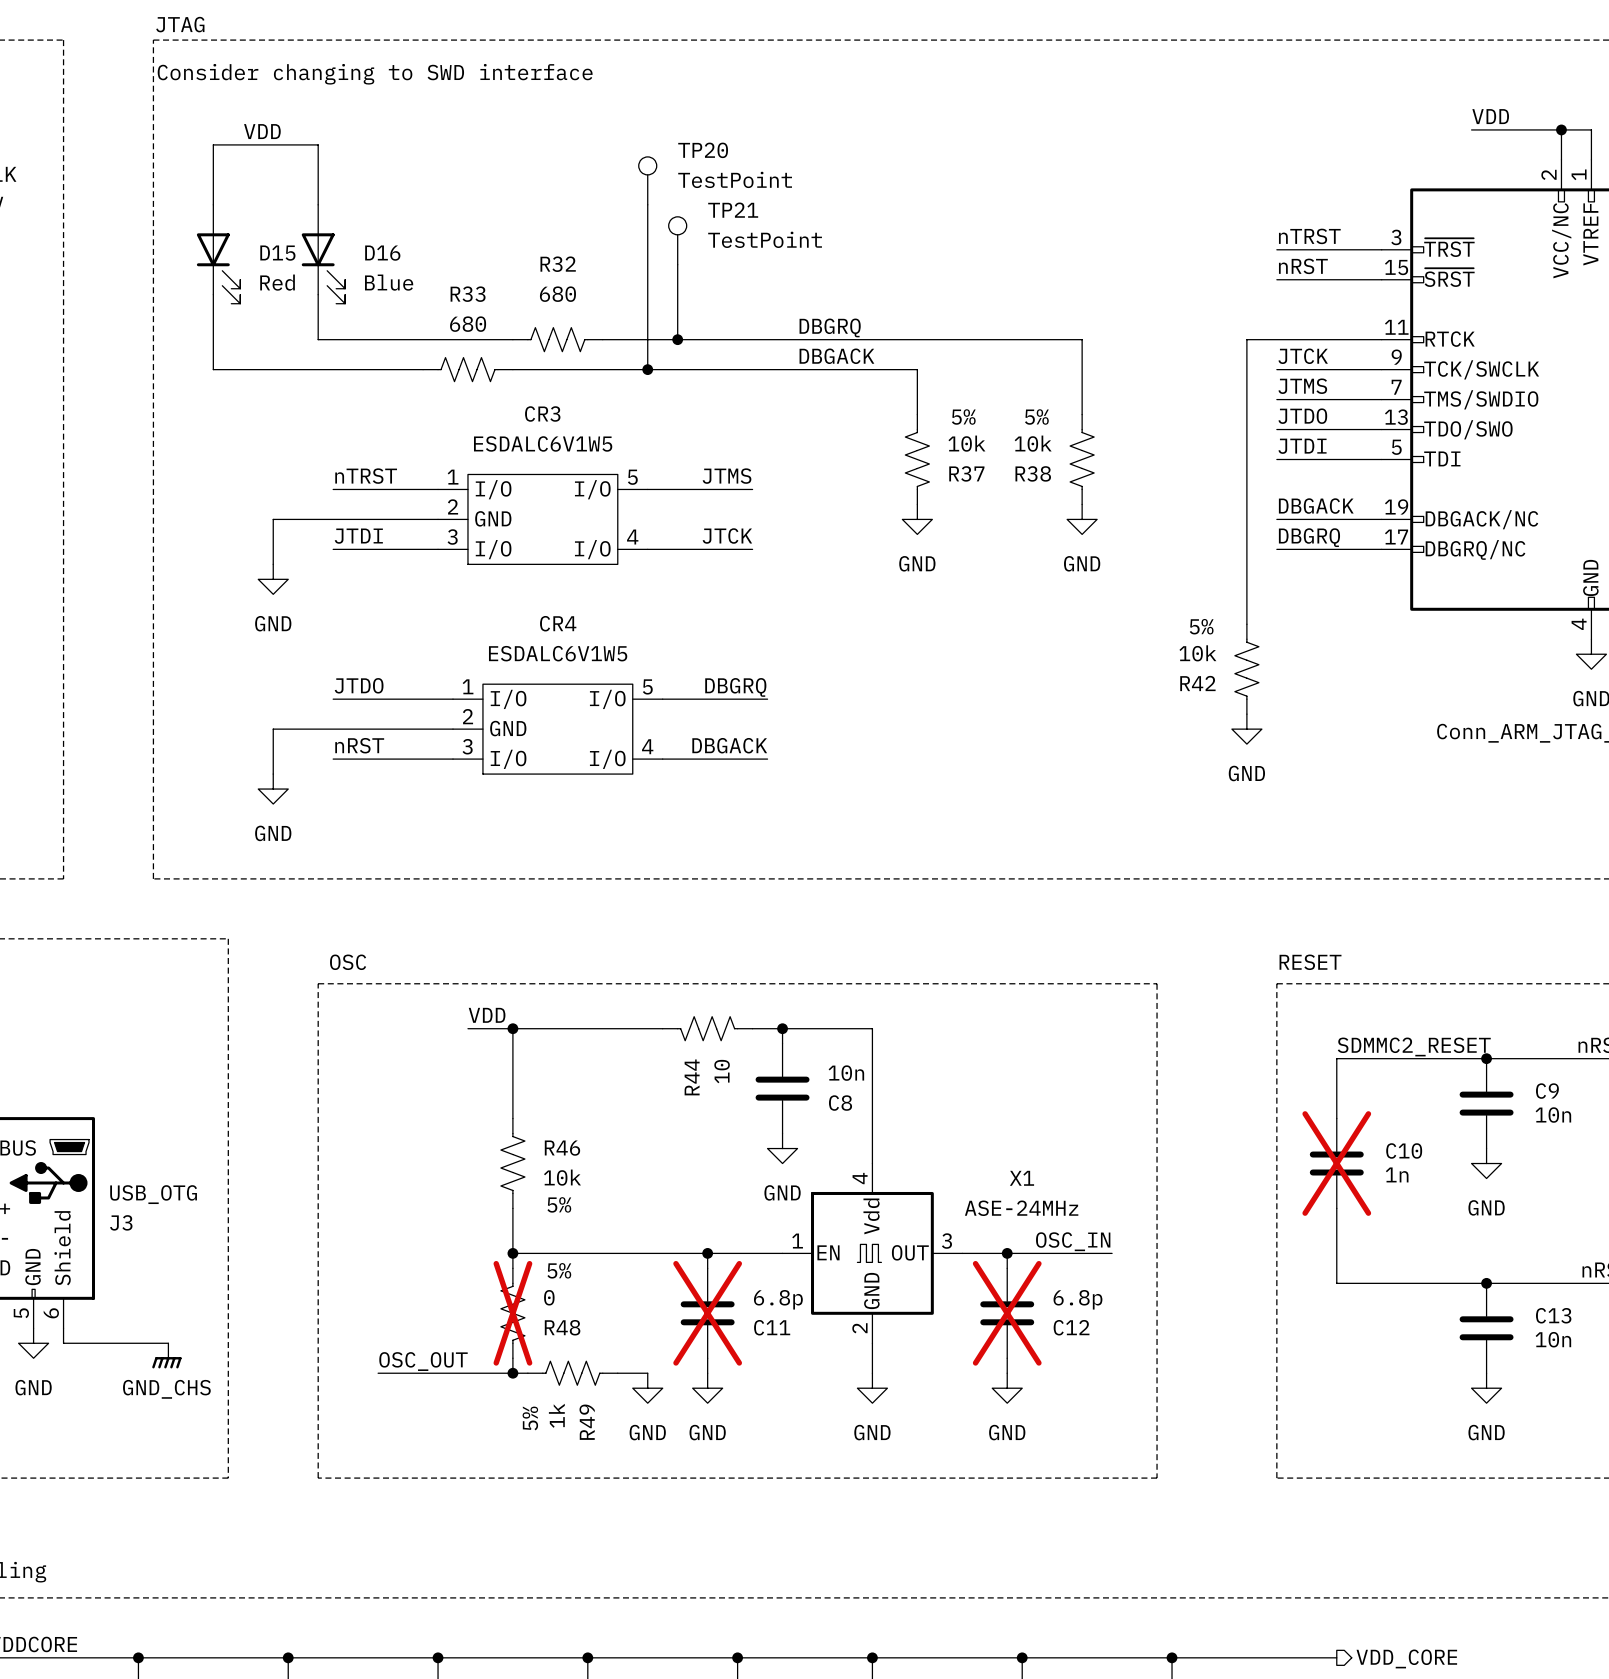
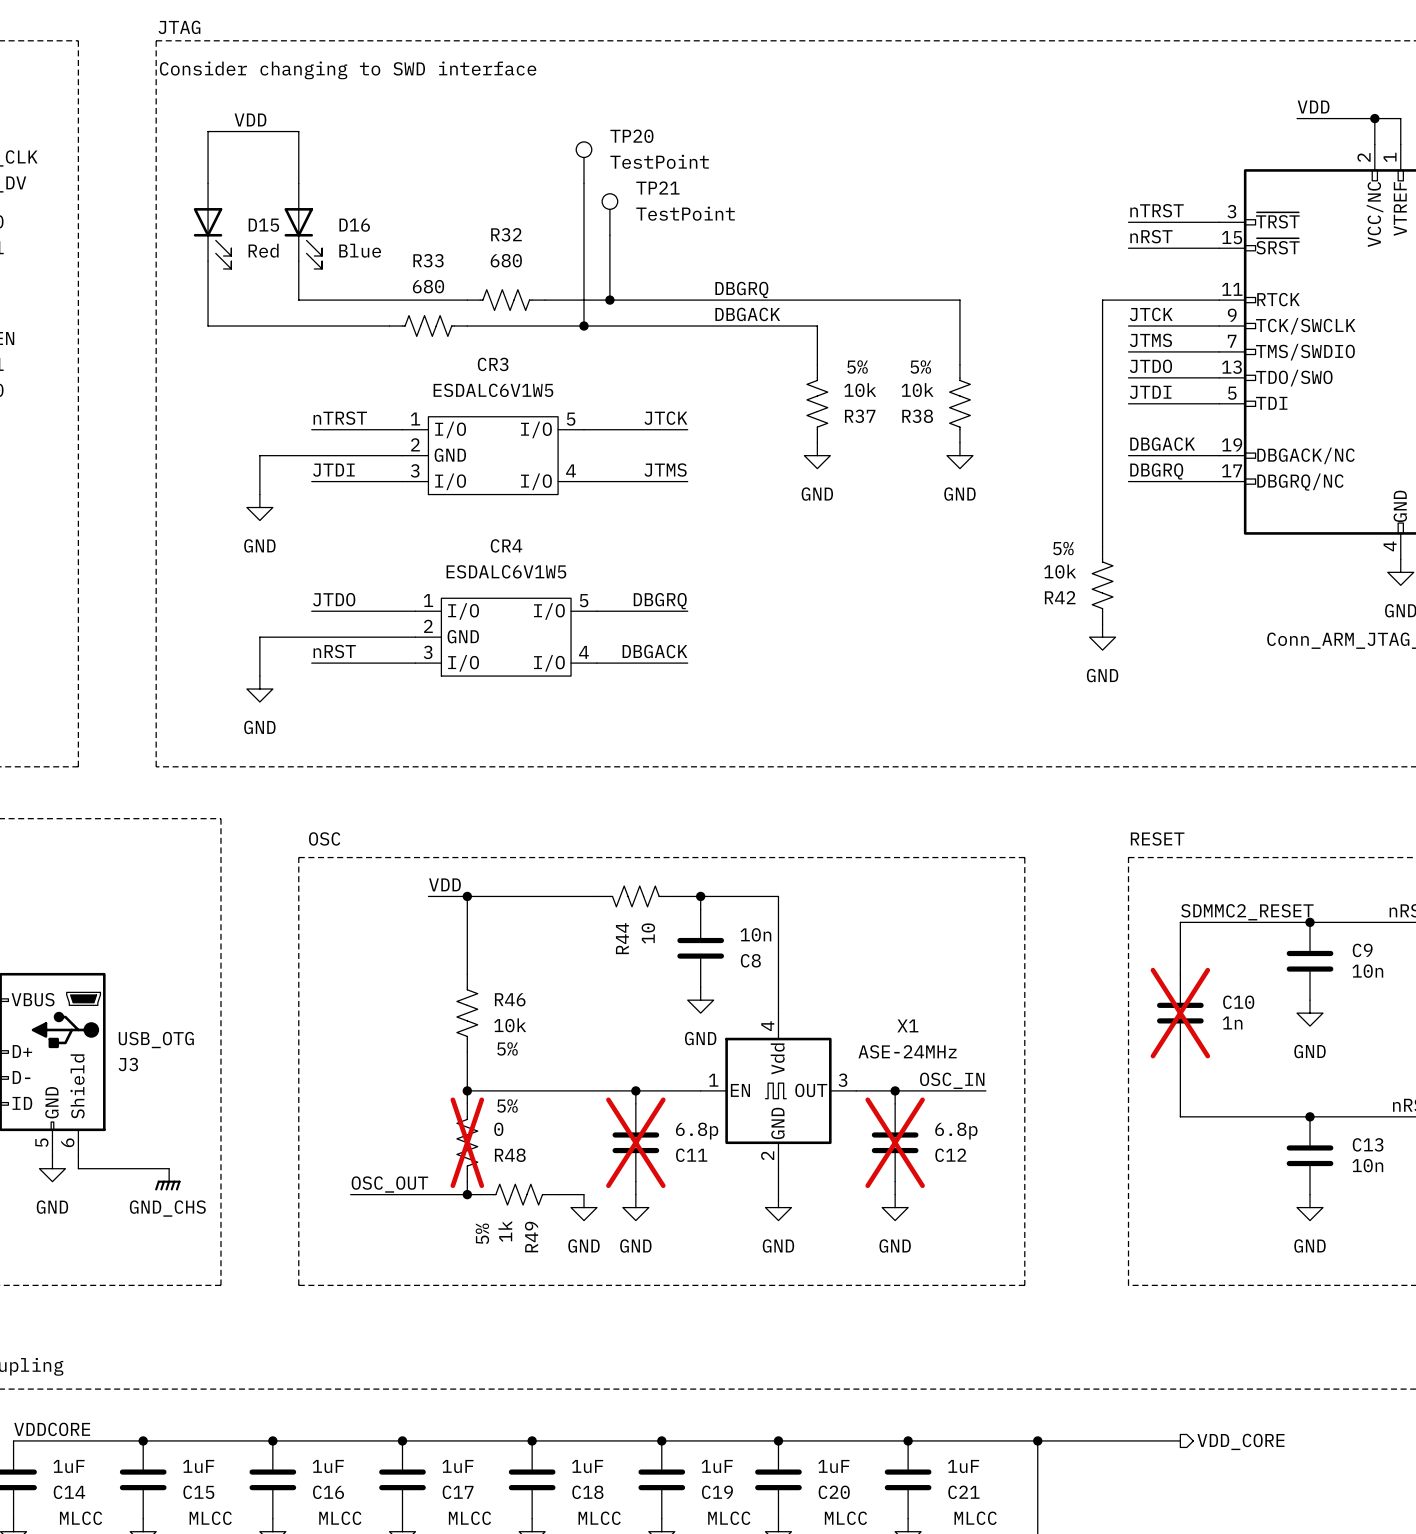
label position: JTMS (727, 476) -> JTMS (665, 470)
wire: none -> (674, 429) (687, 429)
label position: JTCK (727, 536) -> JTCK (665, 418)
wire: none -> (674, 481) (687, 481)

